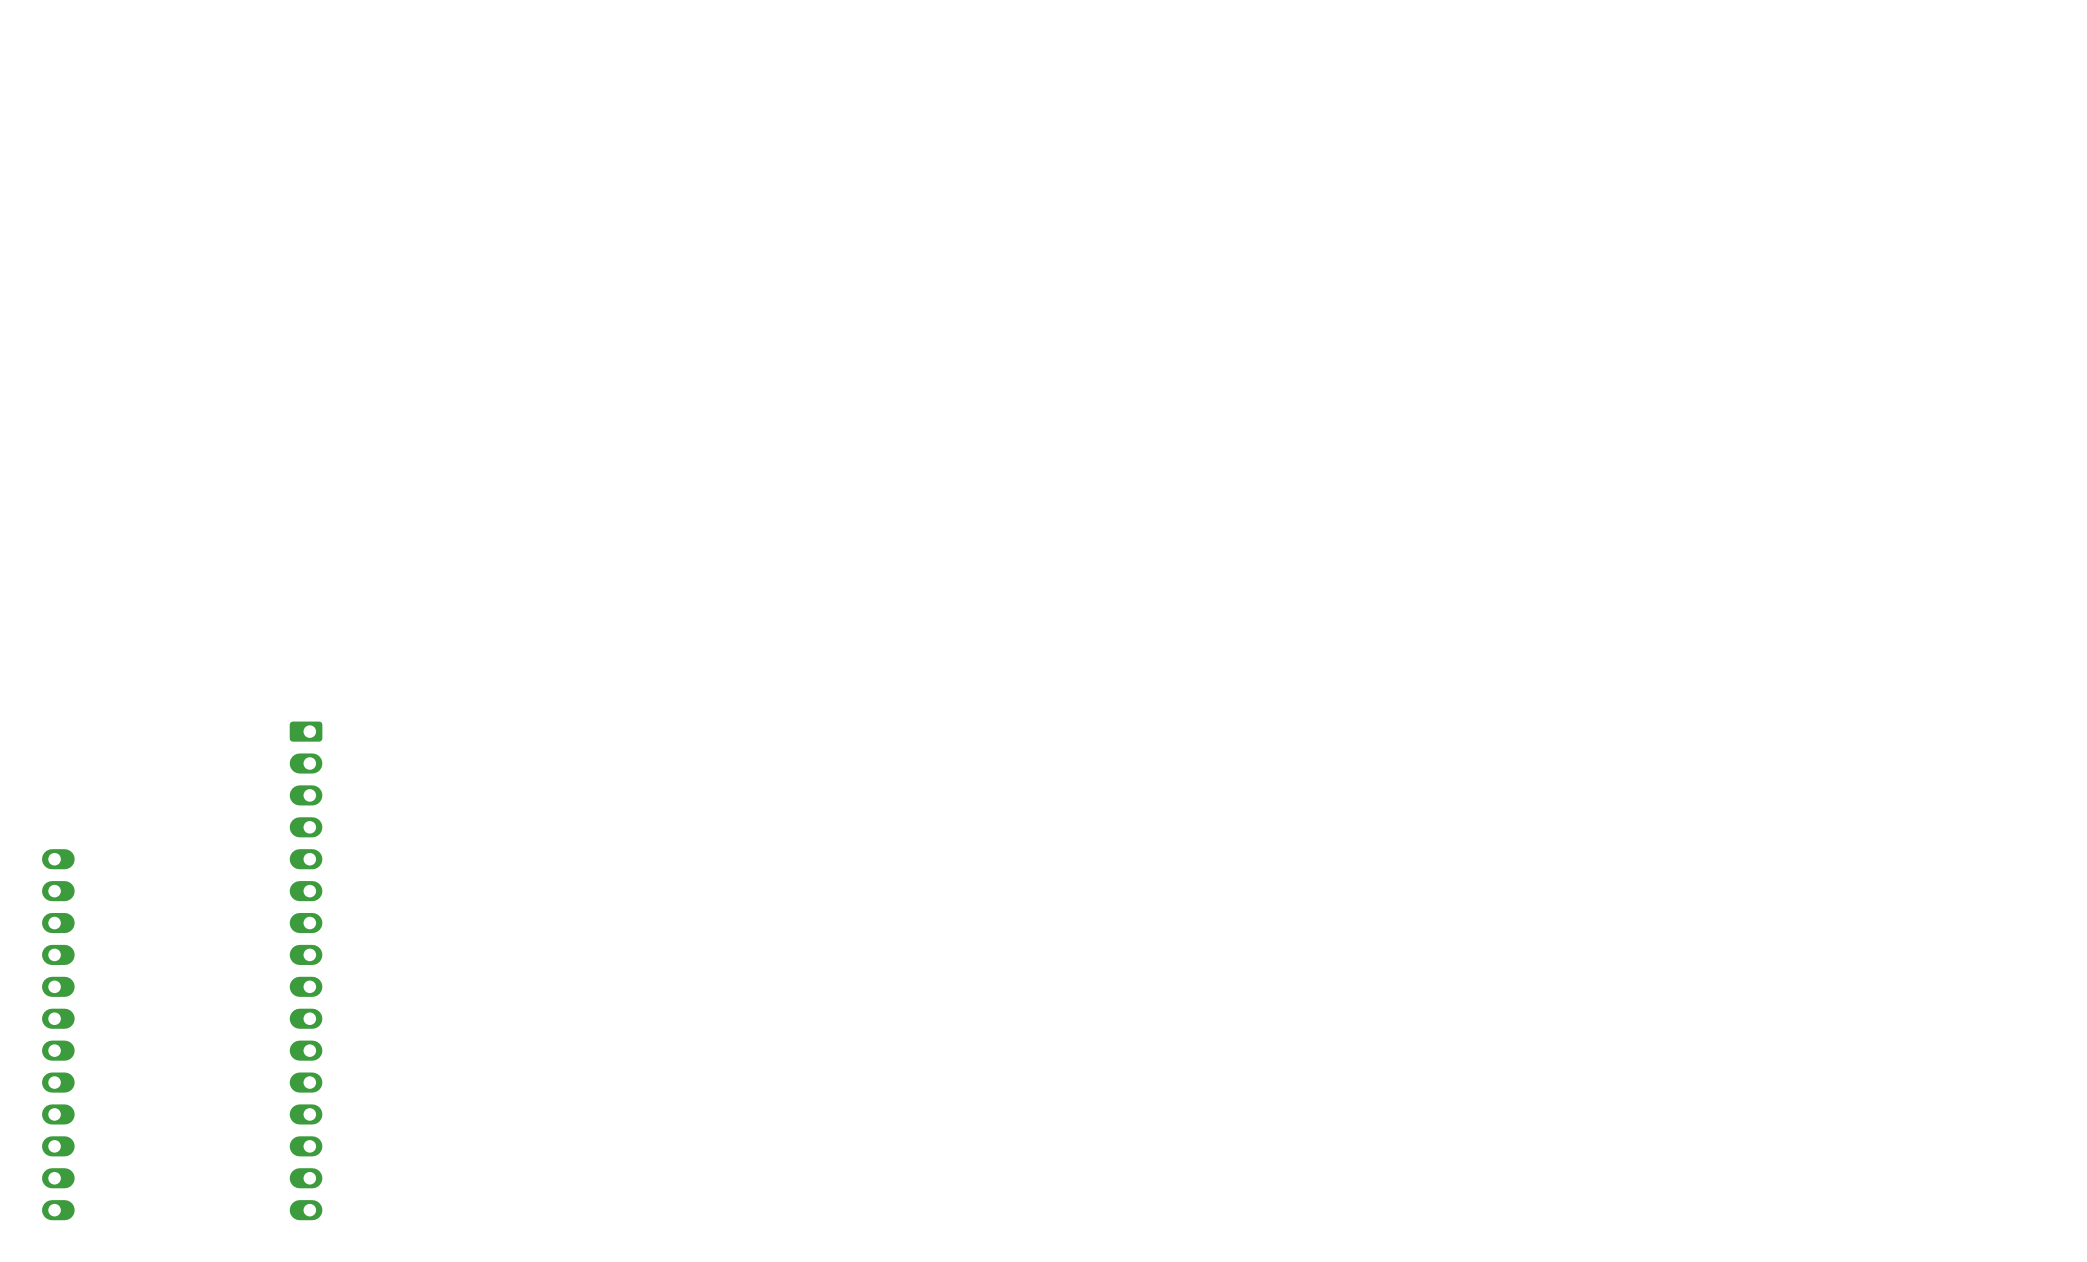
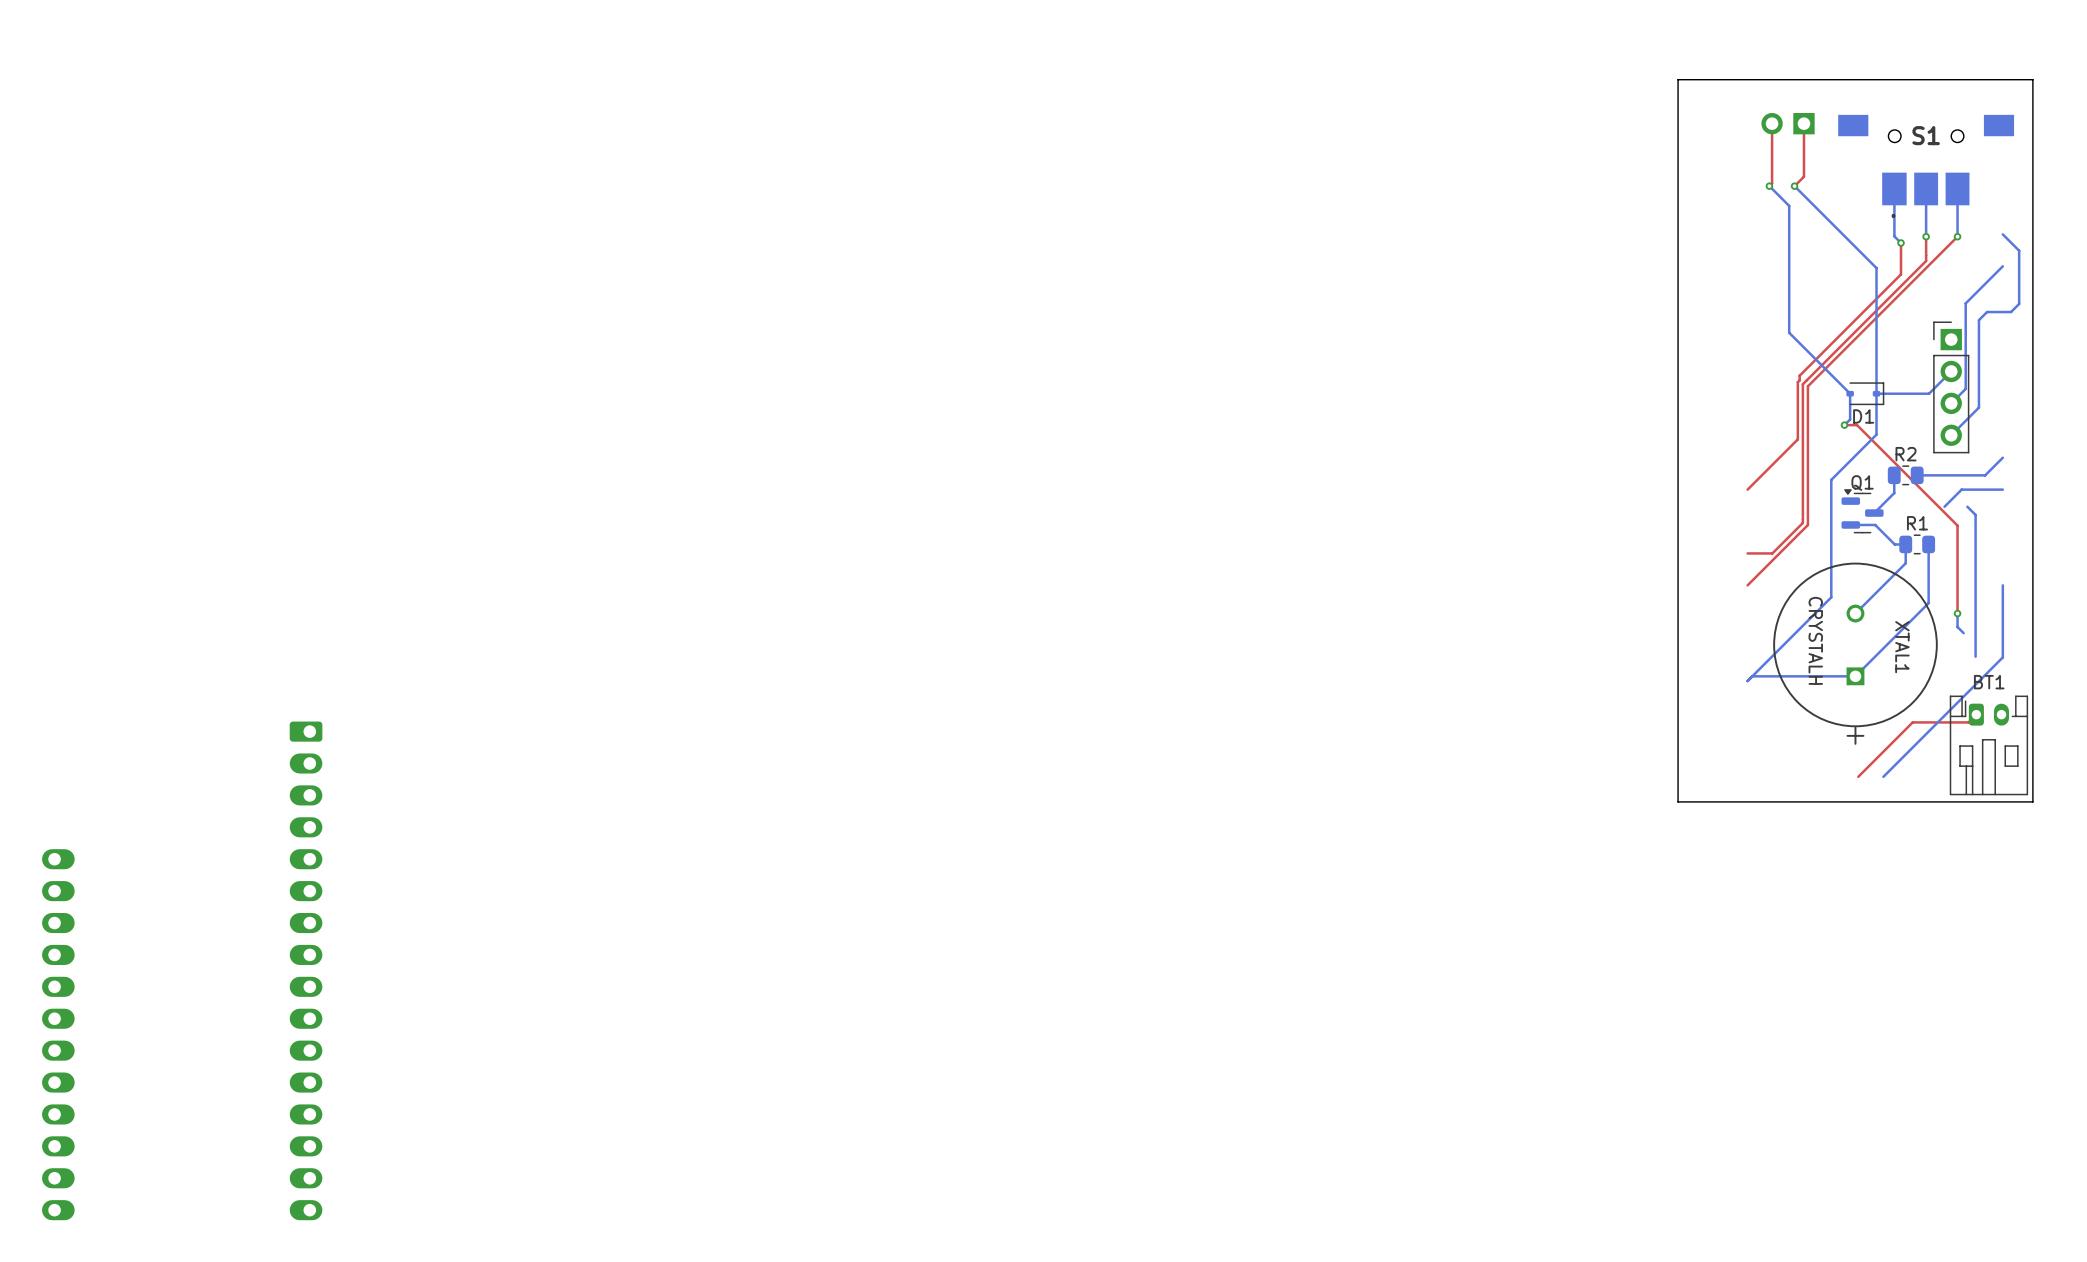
board edge: none -> (2032, 79) (1678, 79) (1678, 801) (2032, 801) (2032, 79)
top track: none -> (1772, 123) (1772, 183) (1769, 186)
part: none -> (1788, 123)
top track: none -> (1803, 123) (1803, 176) (1794, 186)
S1: none -> (1926, 166)
bottom track: none -> (1769, 185) (1789, 205) (1789, 332) (1850, 393) (1850, 419) (1844, 425)
bottom track: none -> (1794, 185) (1876, 268) (1876, 434) (1831, 479) (1831, 597) (1747, 681)
via: none -> (1769, 186)
via: none -> (1794, 186)
bottom track: none -> (1894, 188) (1894, 236) (1901, 242)
bottom track: none -> (1926, 188) (1926, 236)
bottom track: none -> (1957, 188) (1957, 236)
bottom track: none -> (2002, 234) (2019, 250) (2019, 303) (2011, 312) (1987, 312) (1978, 320) (1978, 407) (1951, 435)
top track: none -> (1926, 236) (1926, 260) (1802, 384) (1802, 522) (1772, 553) (1747, 553)
via: none -> (1926, 236)
top track: none -> (1957, 236) (1807, 386) (1807, 525) (1747, 585)
via: none -> (1957, 236)
top track: none -> (1901, 242) (1901, 274) (1799, 375) (1797, 382) (1797, 439) (1747, 489)
via: none -> (1901, 242)
bottom track: none -> (2002, 266) (1965, 303) (1965, 388) (1951, 403)
bottom track: none -> (1951, 371) (1929, 393) (1876, 393)
part: none -> (1951, 387)
D1: none -> (1865, 393)
top track: none -> (1844, 425) (1857, 425) (1957, 525) (1957, 613)
via: none -> (1844, 425)
bottom track: none -> (2002, 457) (1985, 475) (1917, 475)
bottom track: none -> (1894, 475) (1894, 493) (1874, 513)
R2: none -> (1905, 475)
bottom track: none -> (2002, 489) (1961, 489) (1944, 506)
bottom track: none -> (1967, 506) (1975, 514) (1975, 656)
Q1: none -> (1862, 511)
bottom track: none -> (1850, 524) (1875, 524) (1894, 544) (1905, 544) (1905, 563) (1855, 613)
R1: none -> (1917, 544)
bottom track: none -> (1928, 544) (1928, 603) (1855, 676) (1752, 676)
bottom track: none -> (2002, 585) (2002, 657) (1883, 776)
bottom track: none -> (1957, 613) (1957, 627) (1963, 633)
via: none -> (1957, 613)
XTAL1: none -> CRYSTALH (1855, 653)
top track: none -> (1976, 714) (1968, 722) (1912, 722) (1858, 776)
BT1: none -> (1988, 745)

